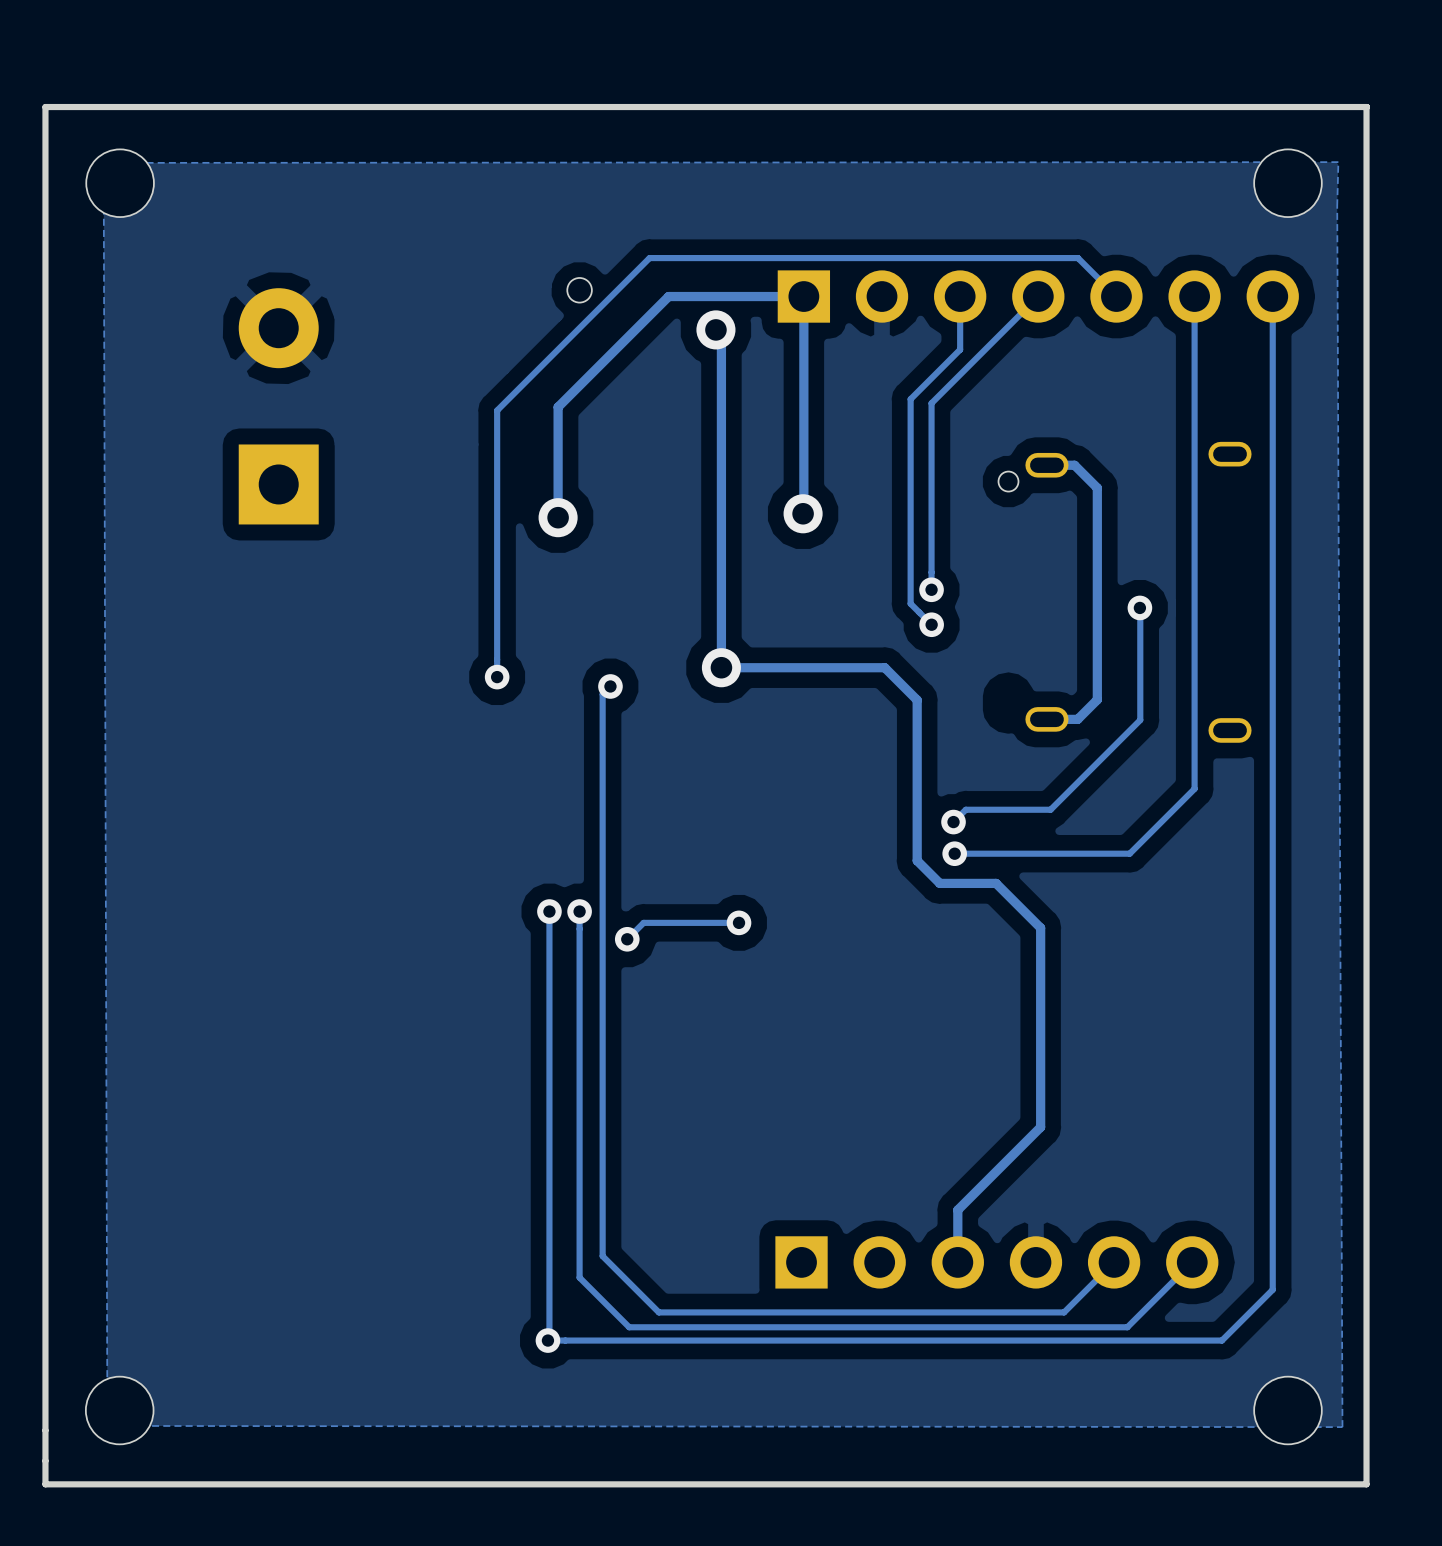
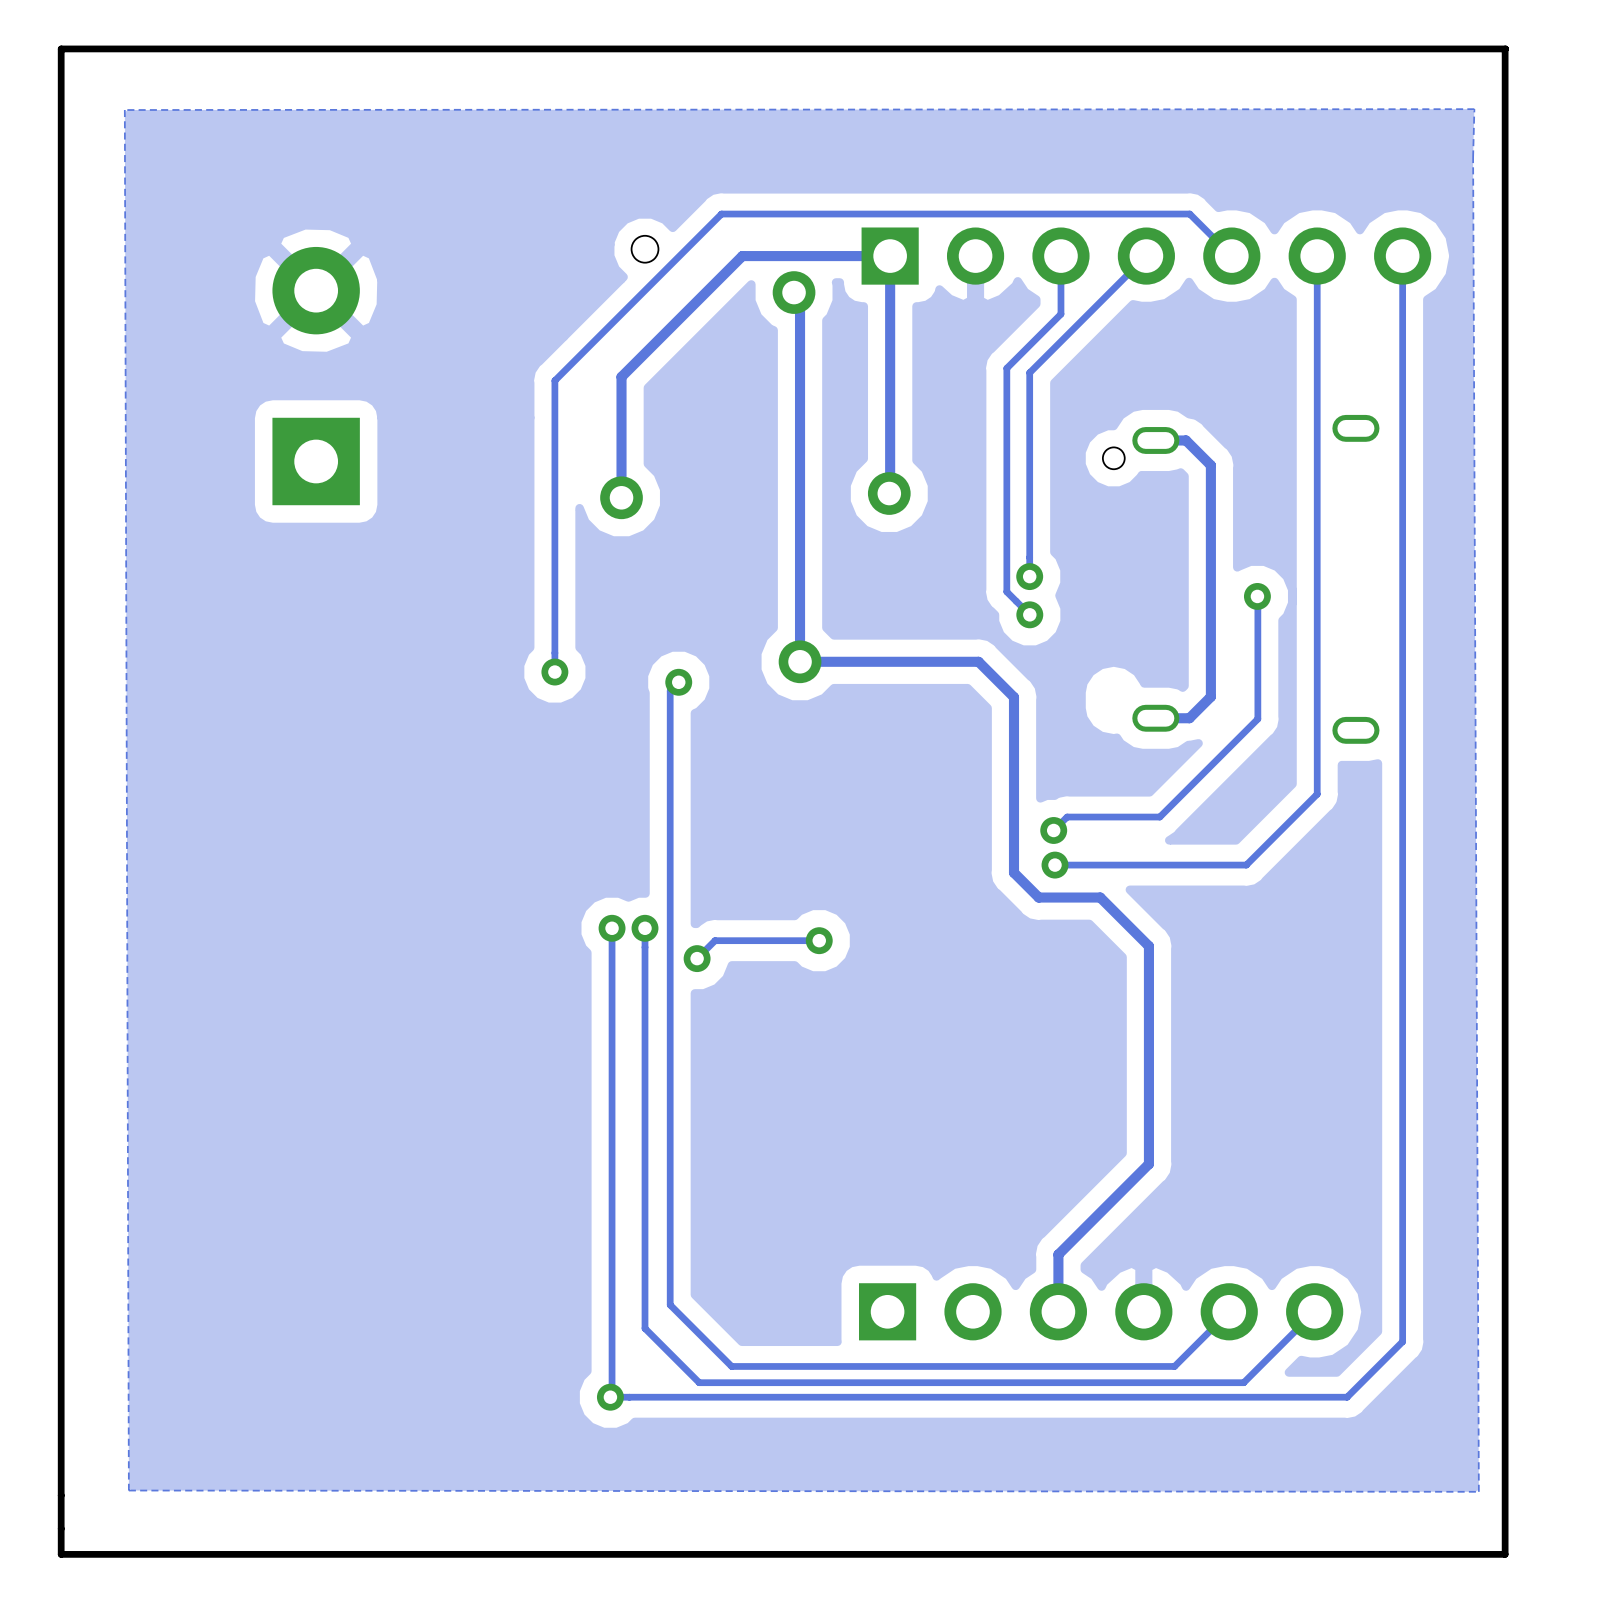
part: (120, 183) -> none
part: (1287, 183) -> none
part: (119, 1410) -> none
part: (1287, 1410) -> none

